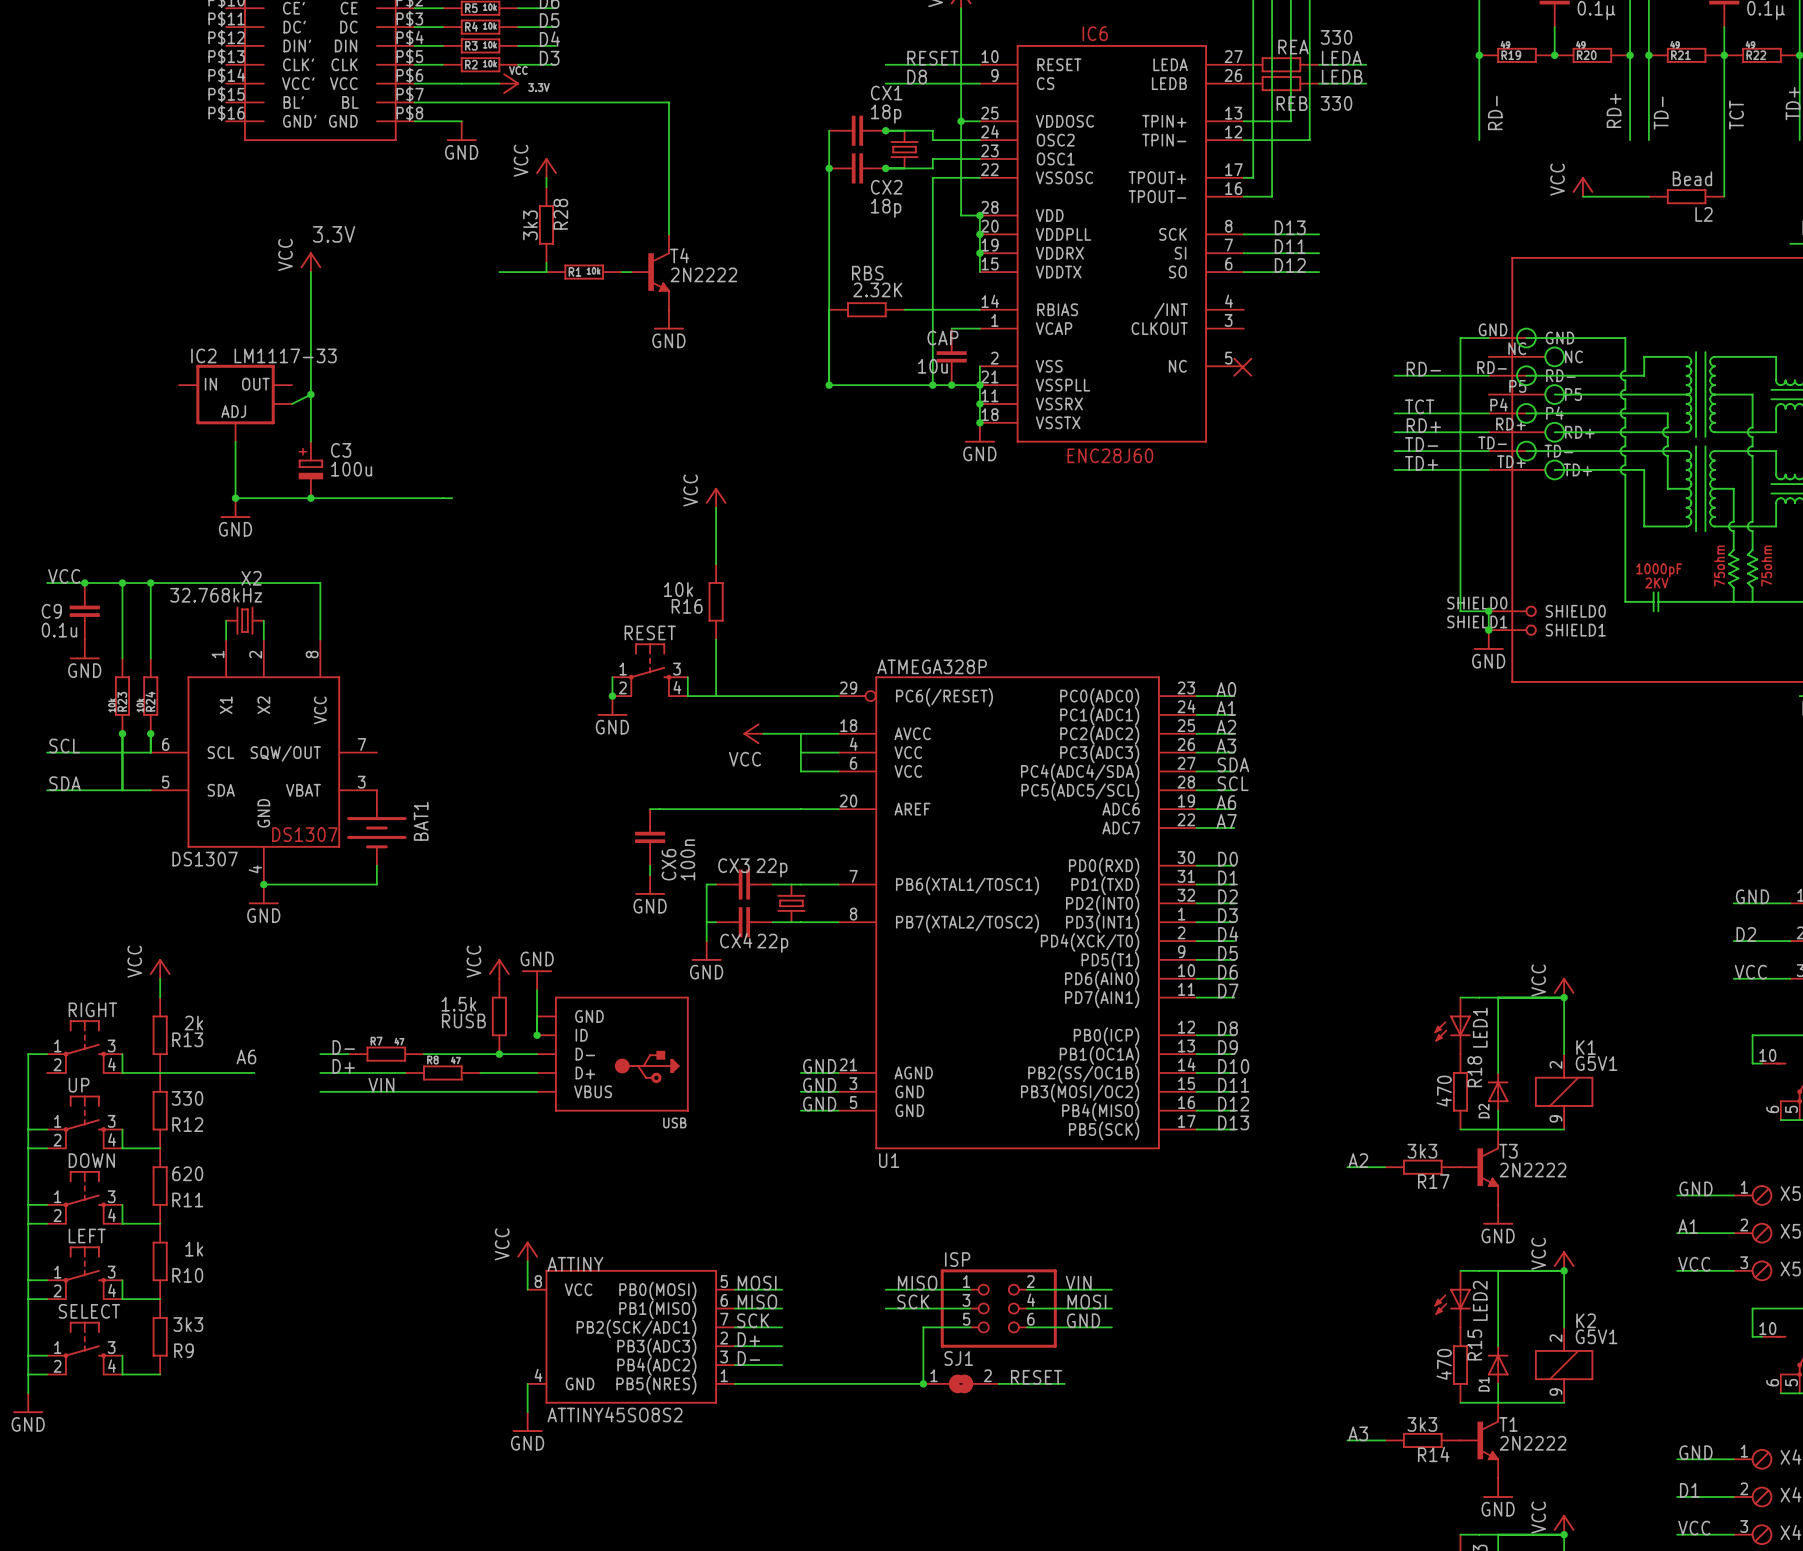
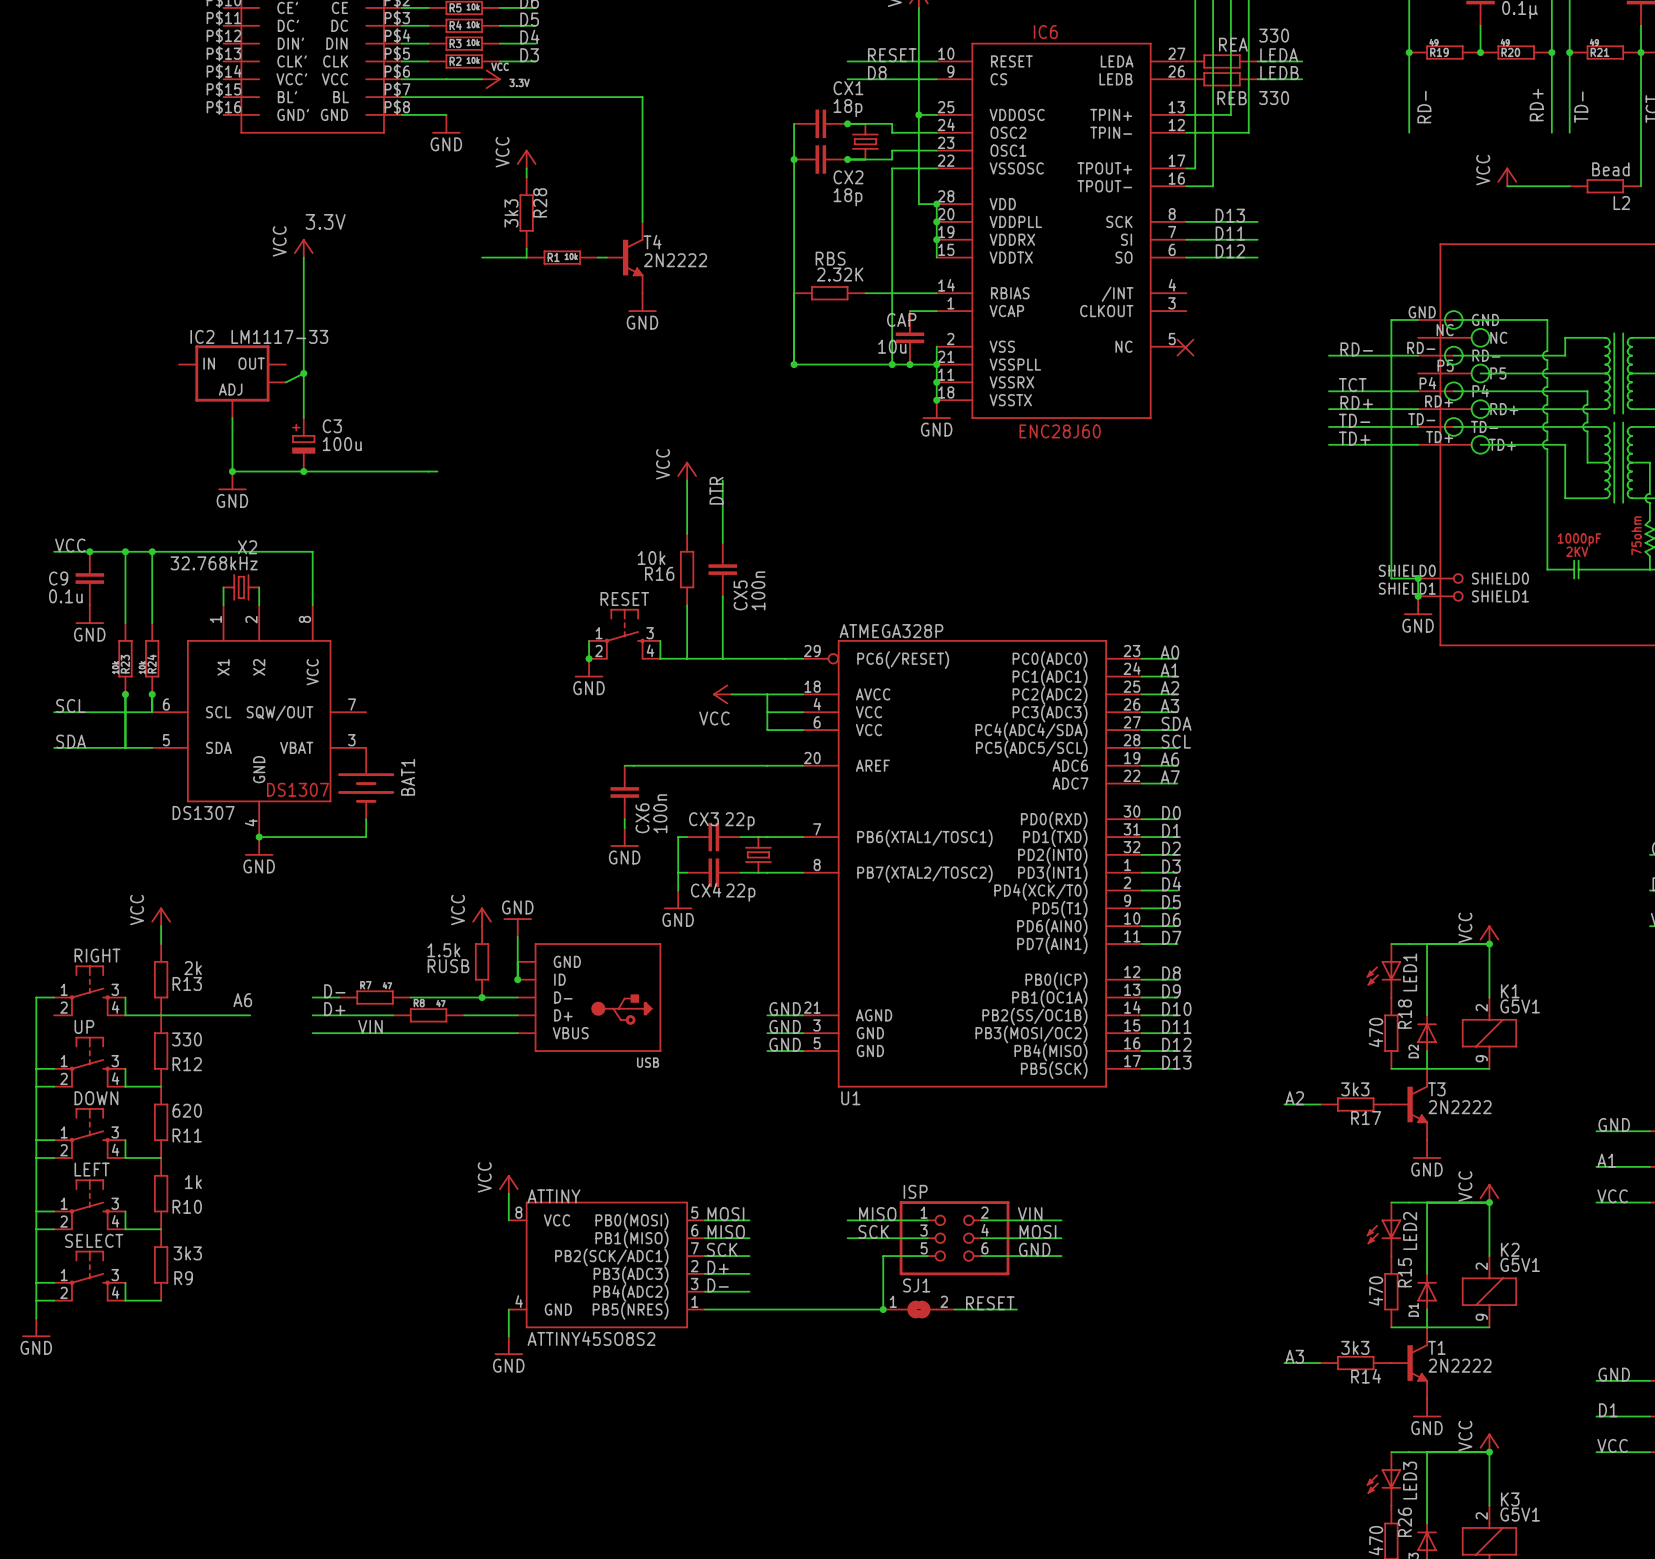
wire: none -> (722, 480) (722, 542)
label: none -> DTR (716, 490)
CX5: none -> 100n (722, 569)
wire: none -> (722, 596) (722, 658)

